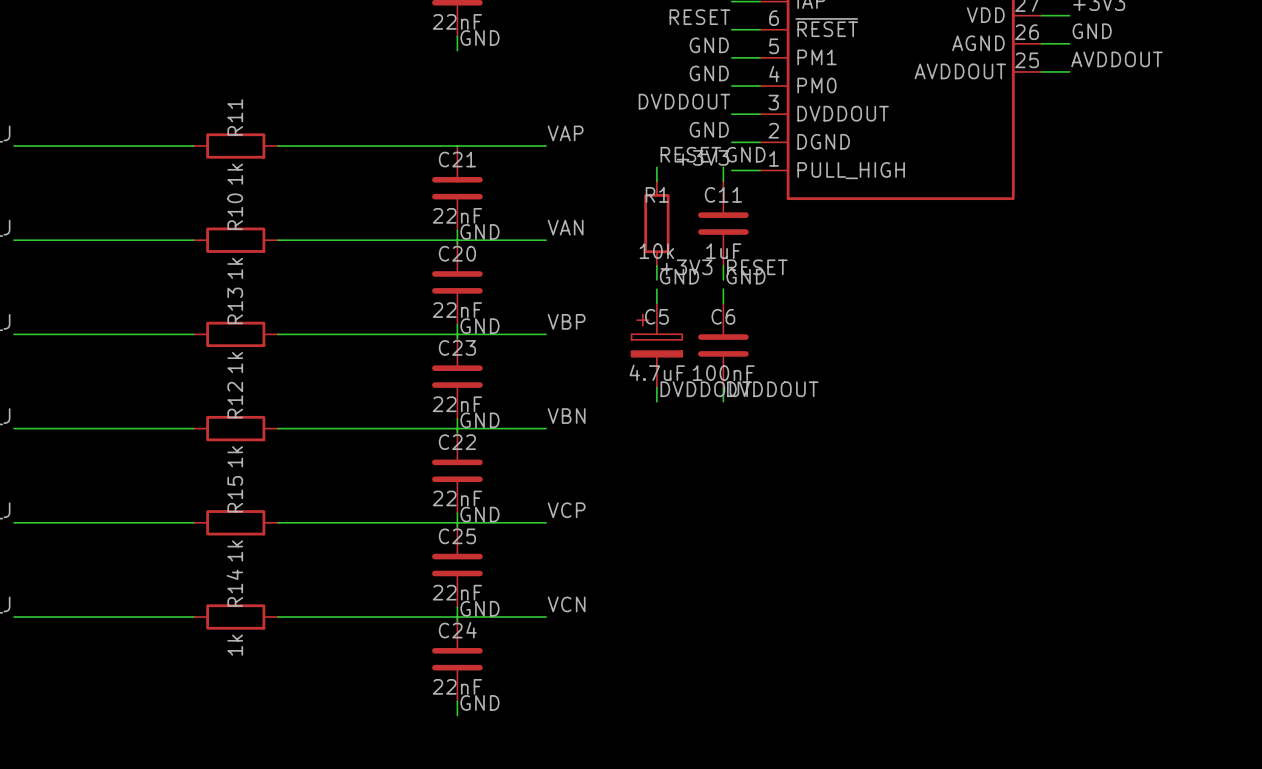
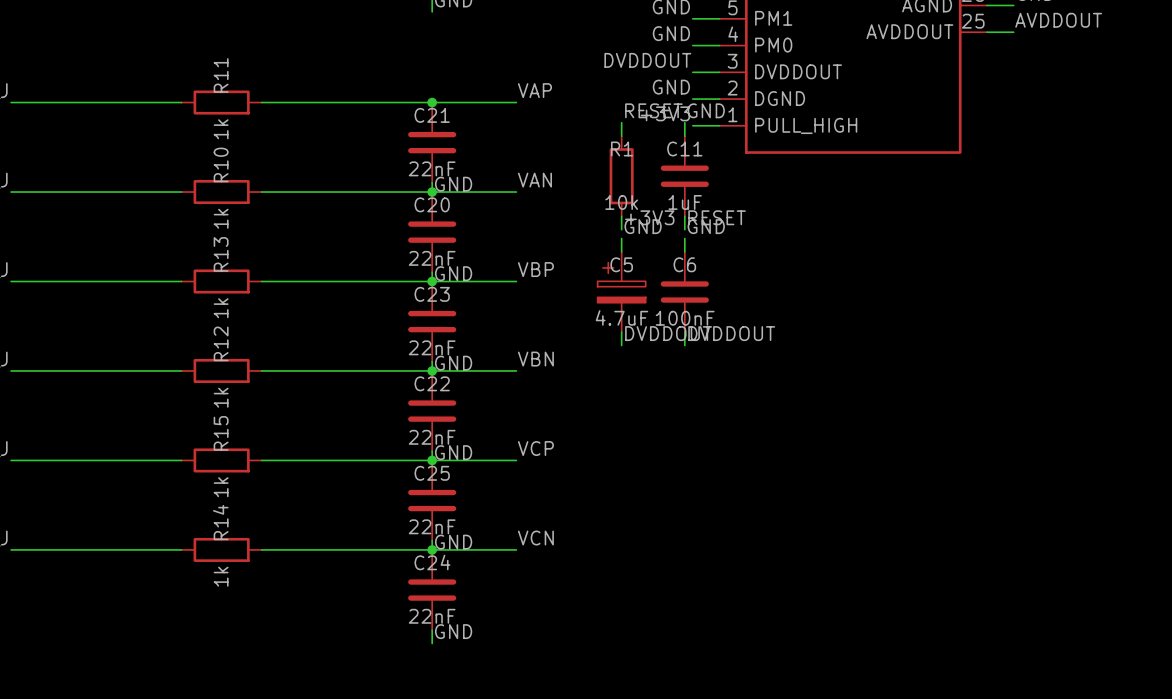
junction: none -> (432, 102)
junction: none -> (432, 192)
junction: none -> (432, 281)
junction: none -> (432, 370)
junction: none -> (432, 460)
junction: none -> (432, 549)

